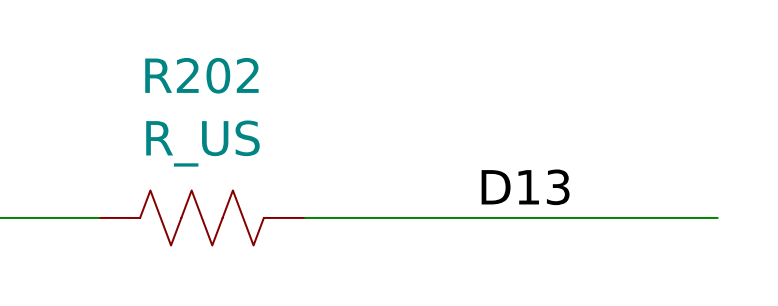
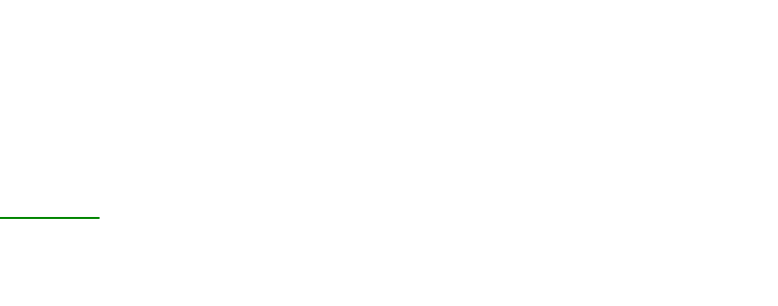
label: D13 (525, 187) -> none
R202: R_US (201, 217) -> none
wire: (305, 217) (717, 217) -> none

